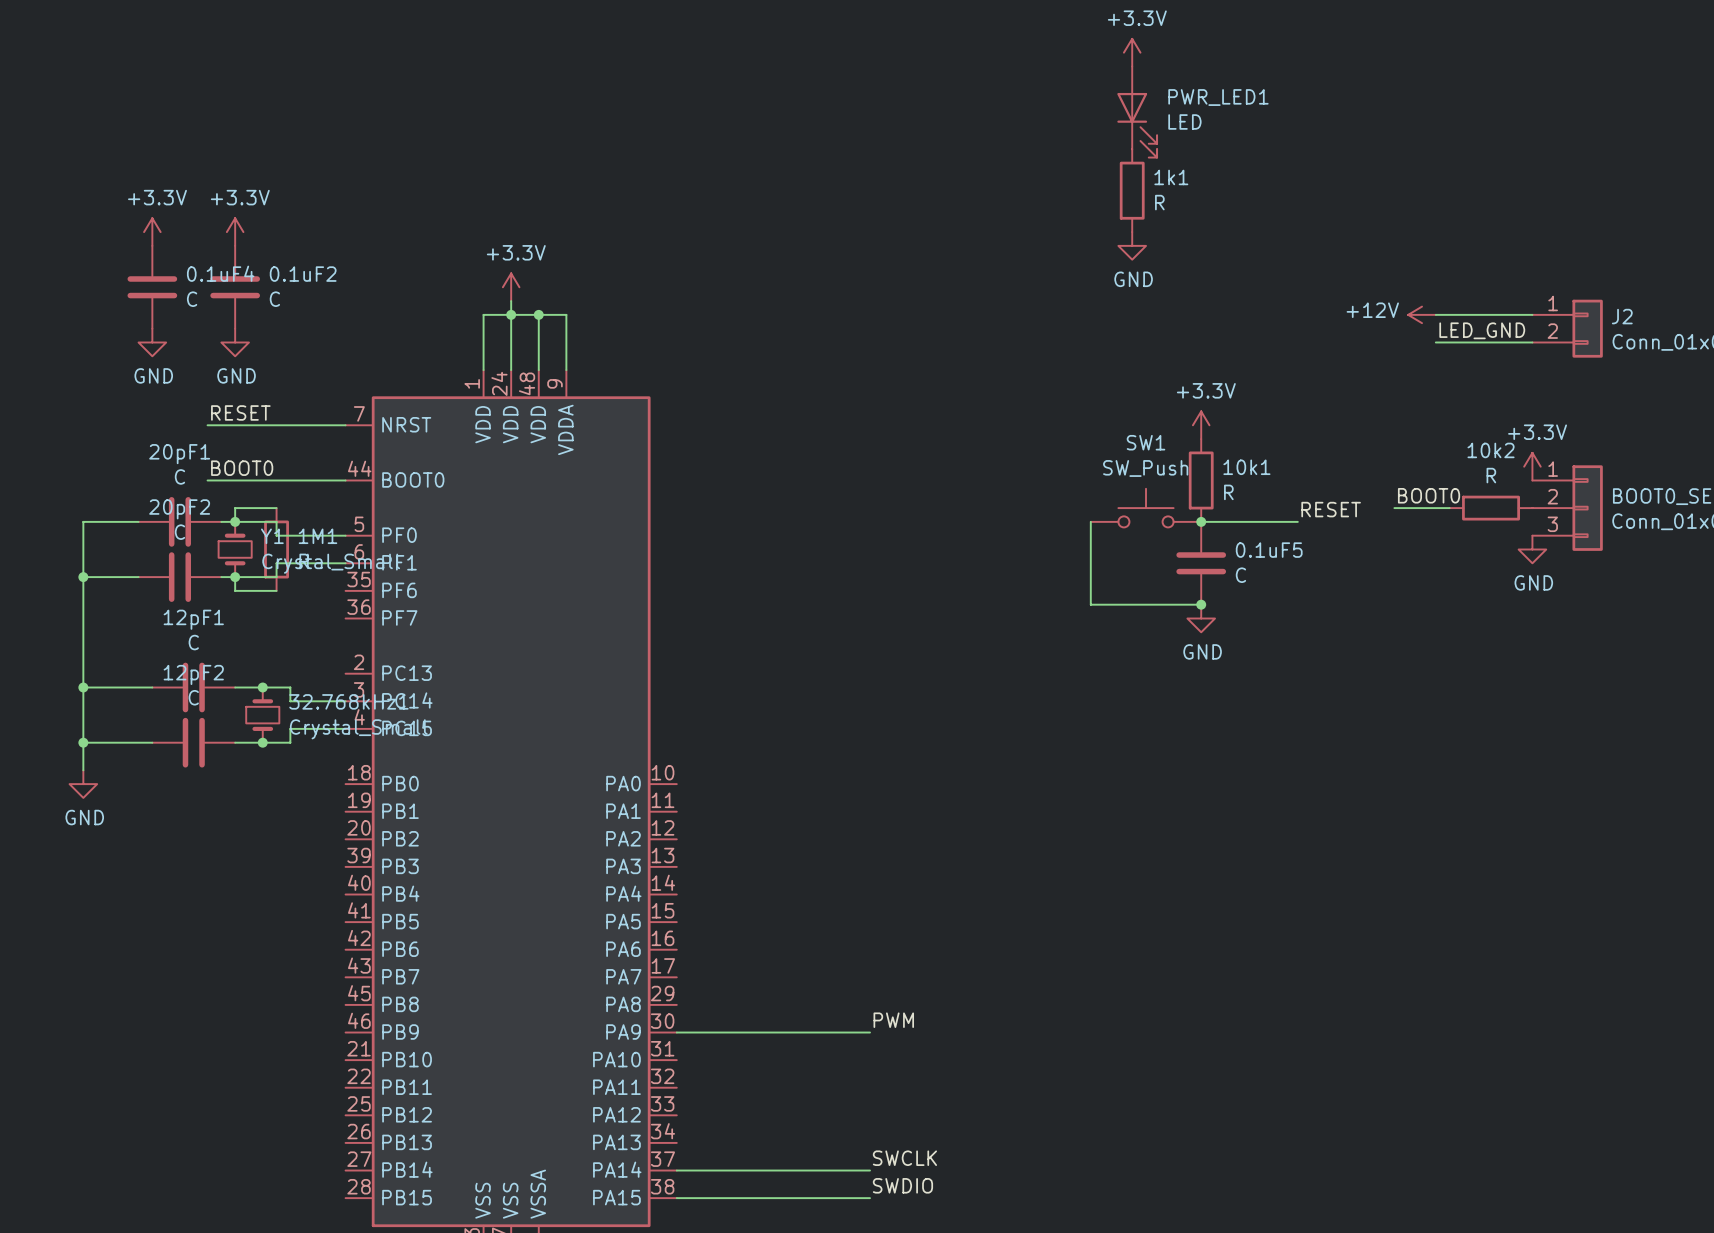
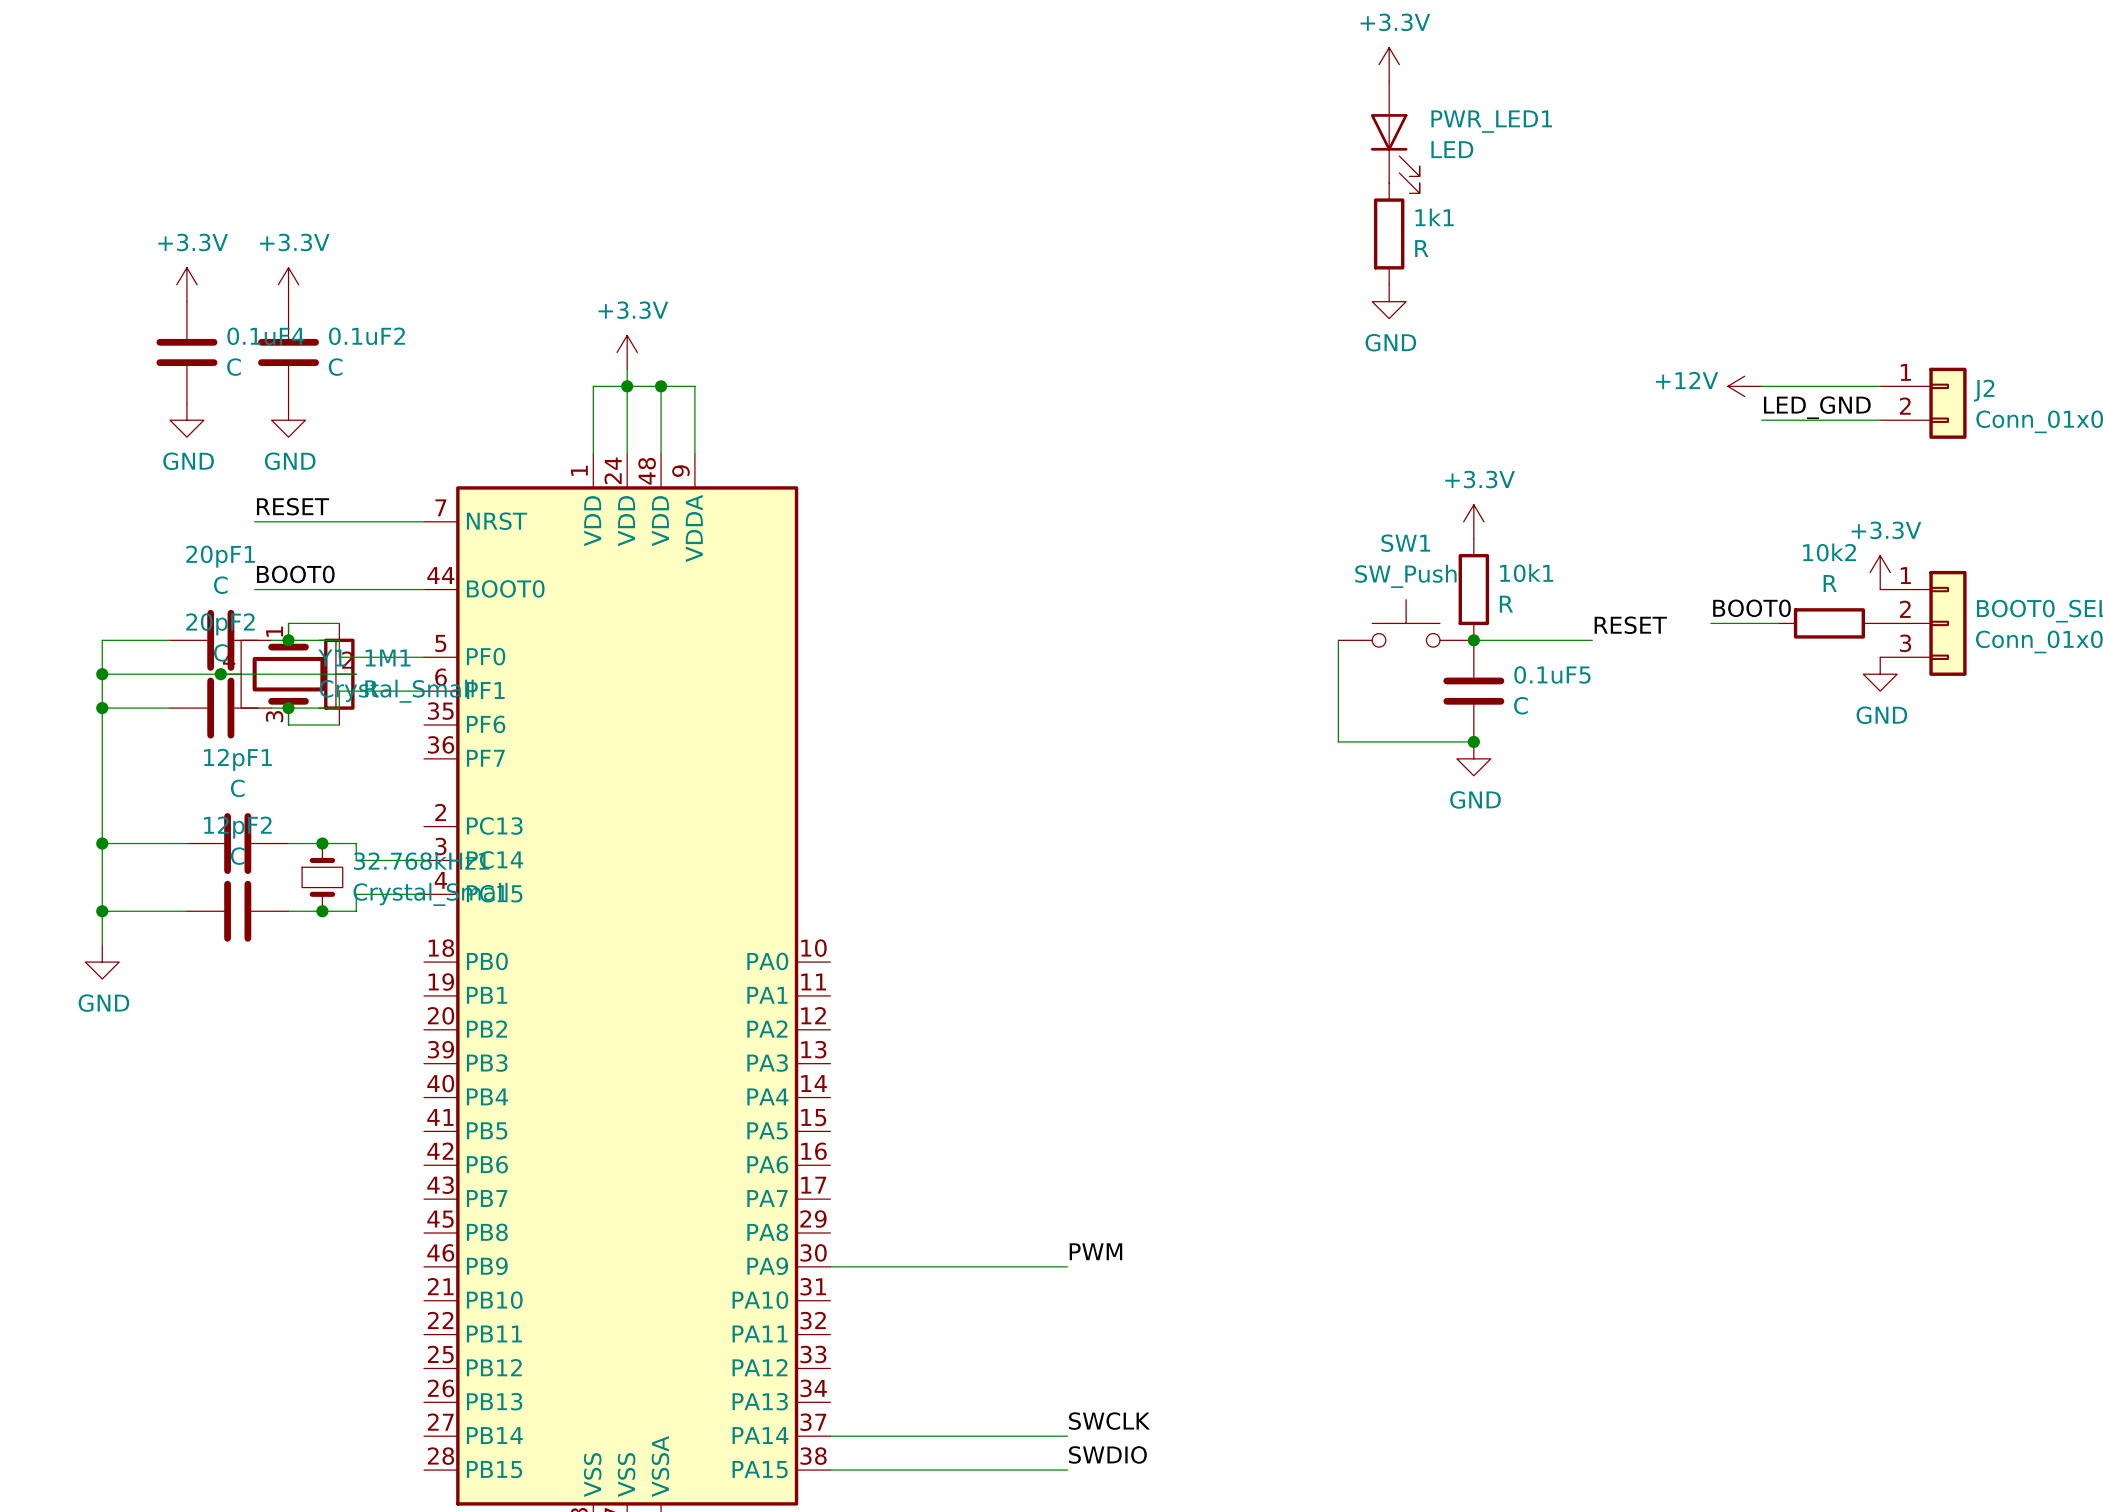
Y1 symbol: [218, 521, 252, 578] -> [220, 623, 357, 726]
wire: none -> (102, 674) (356, 674)
junction: none -> (102, 674)
junction: none -> (220, 674)

